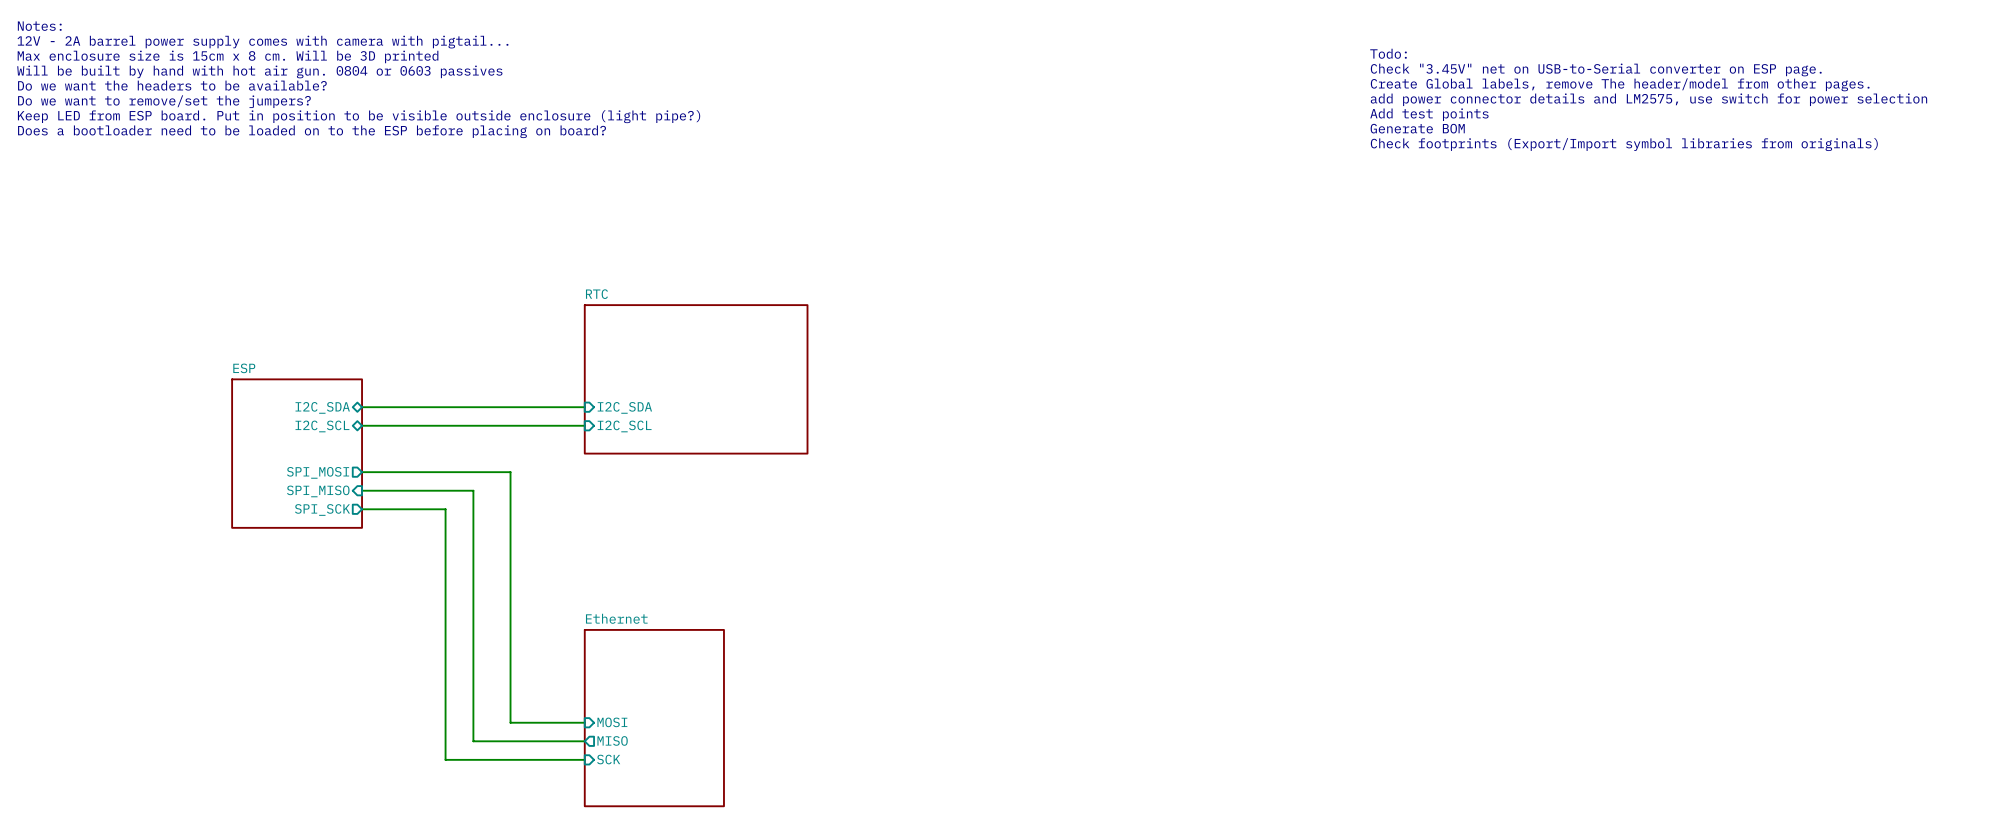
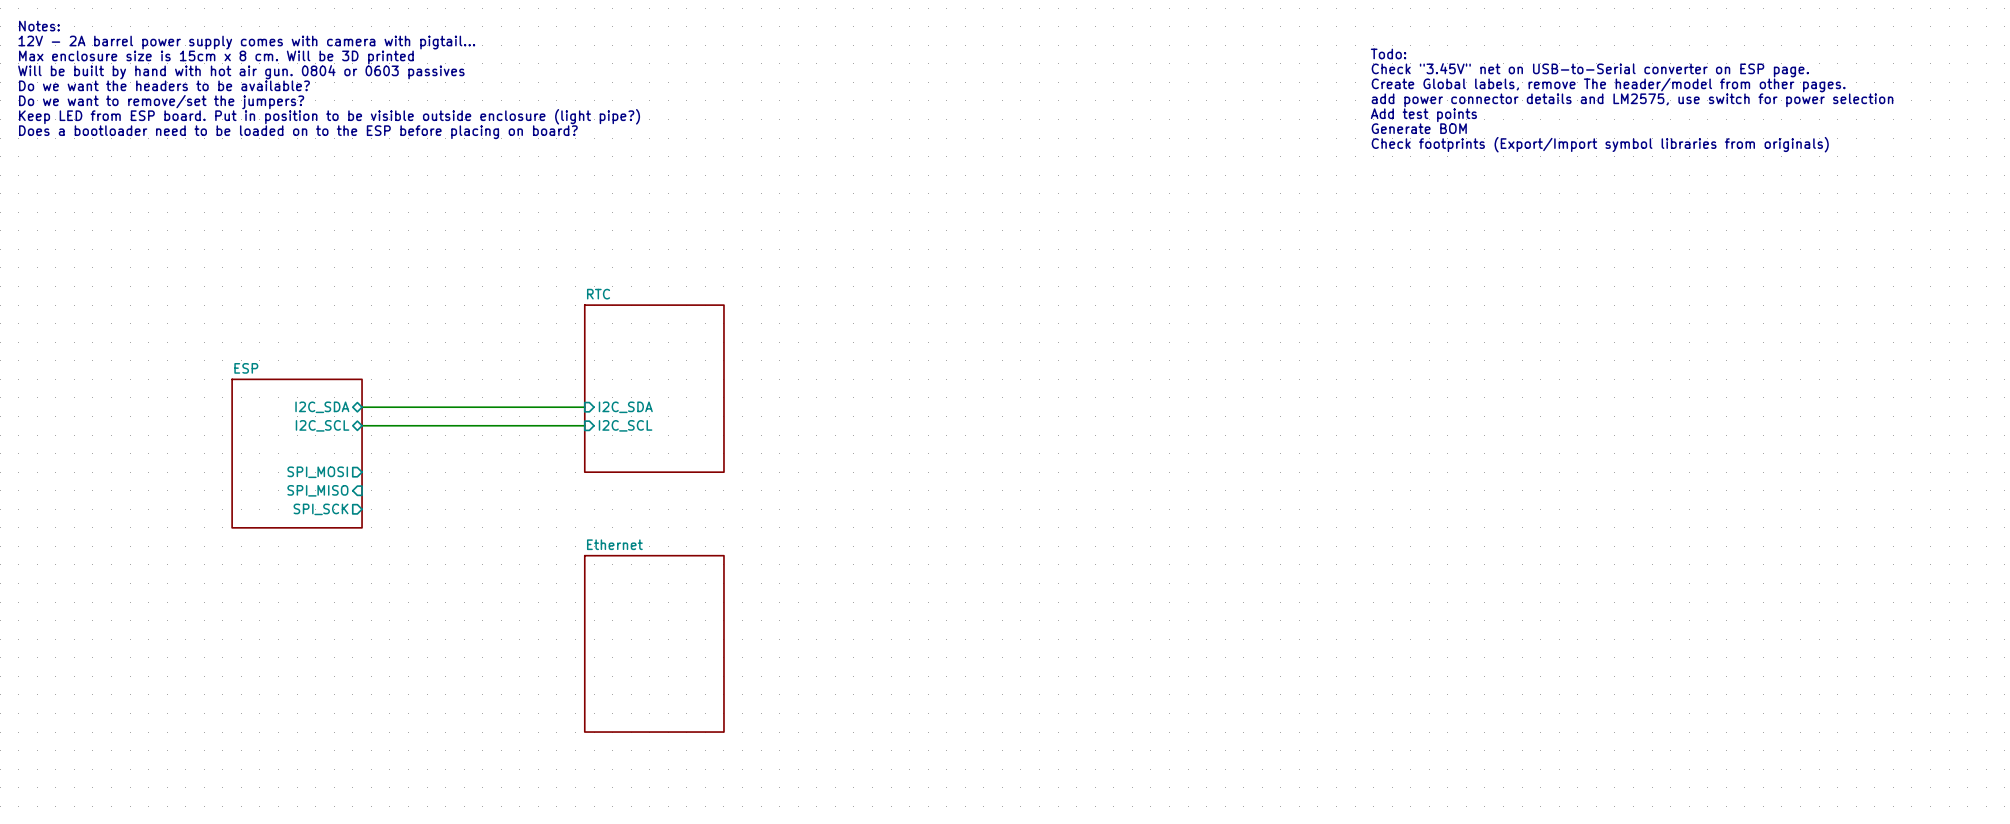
sheet RTC: (696, 379) -> none
sheet RTC: none -> (654, 388)
wire: (362, 472) (510, 472) (510, 722) (584, 722) -> none
wire: (362, 490) (473, 490) (473, 741) (584, 741) -> none
wire: (362, 509) (445, 509) (445, 759) (584, 759) -> none
sheet Ethernet position: (654, 718) -> (654, 643)
sheet pin: MOSI (612, 722) -> none
sheet pin: MISO (612, 740) -> none
sheet pin: SCK (608, 759) -> none

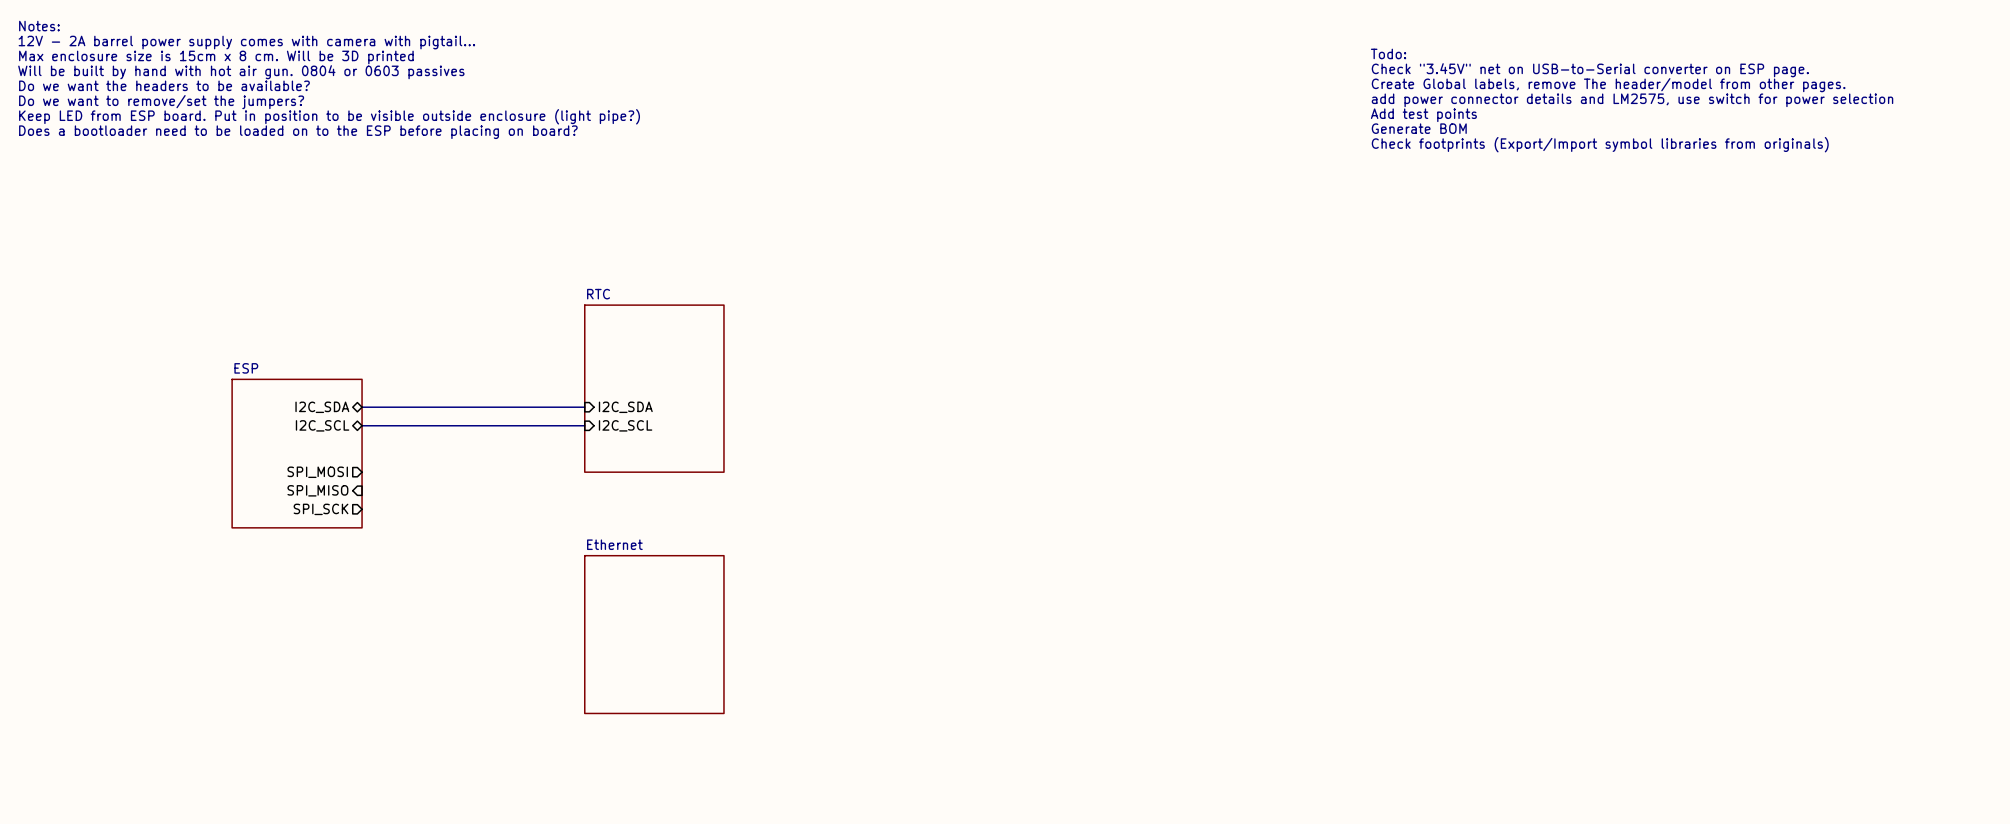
sheet Ethernet: none -> (654, 634)
sheet Ethernet: (654, 643) -> none

